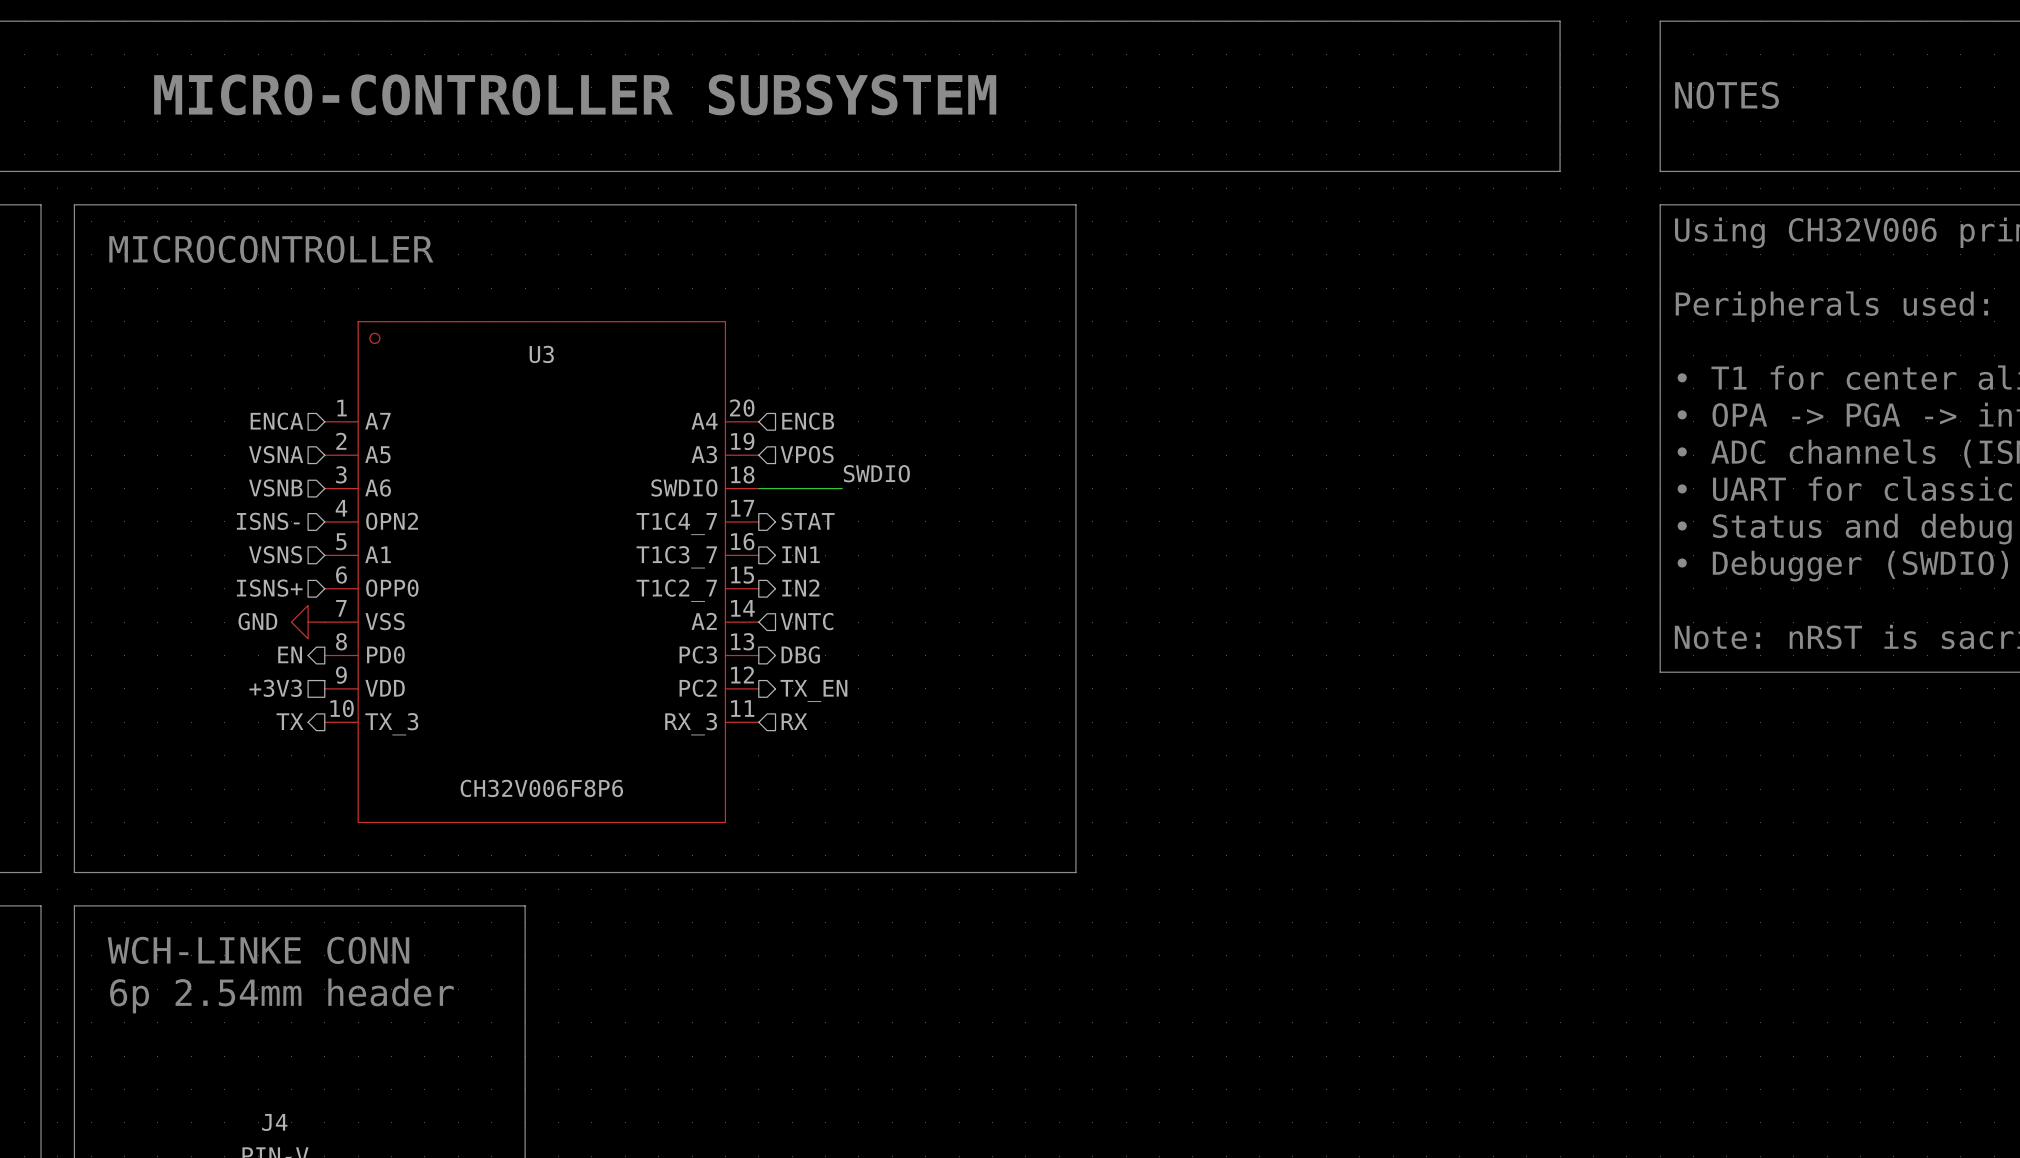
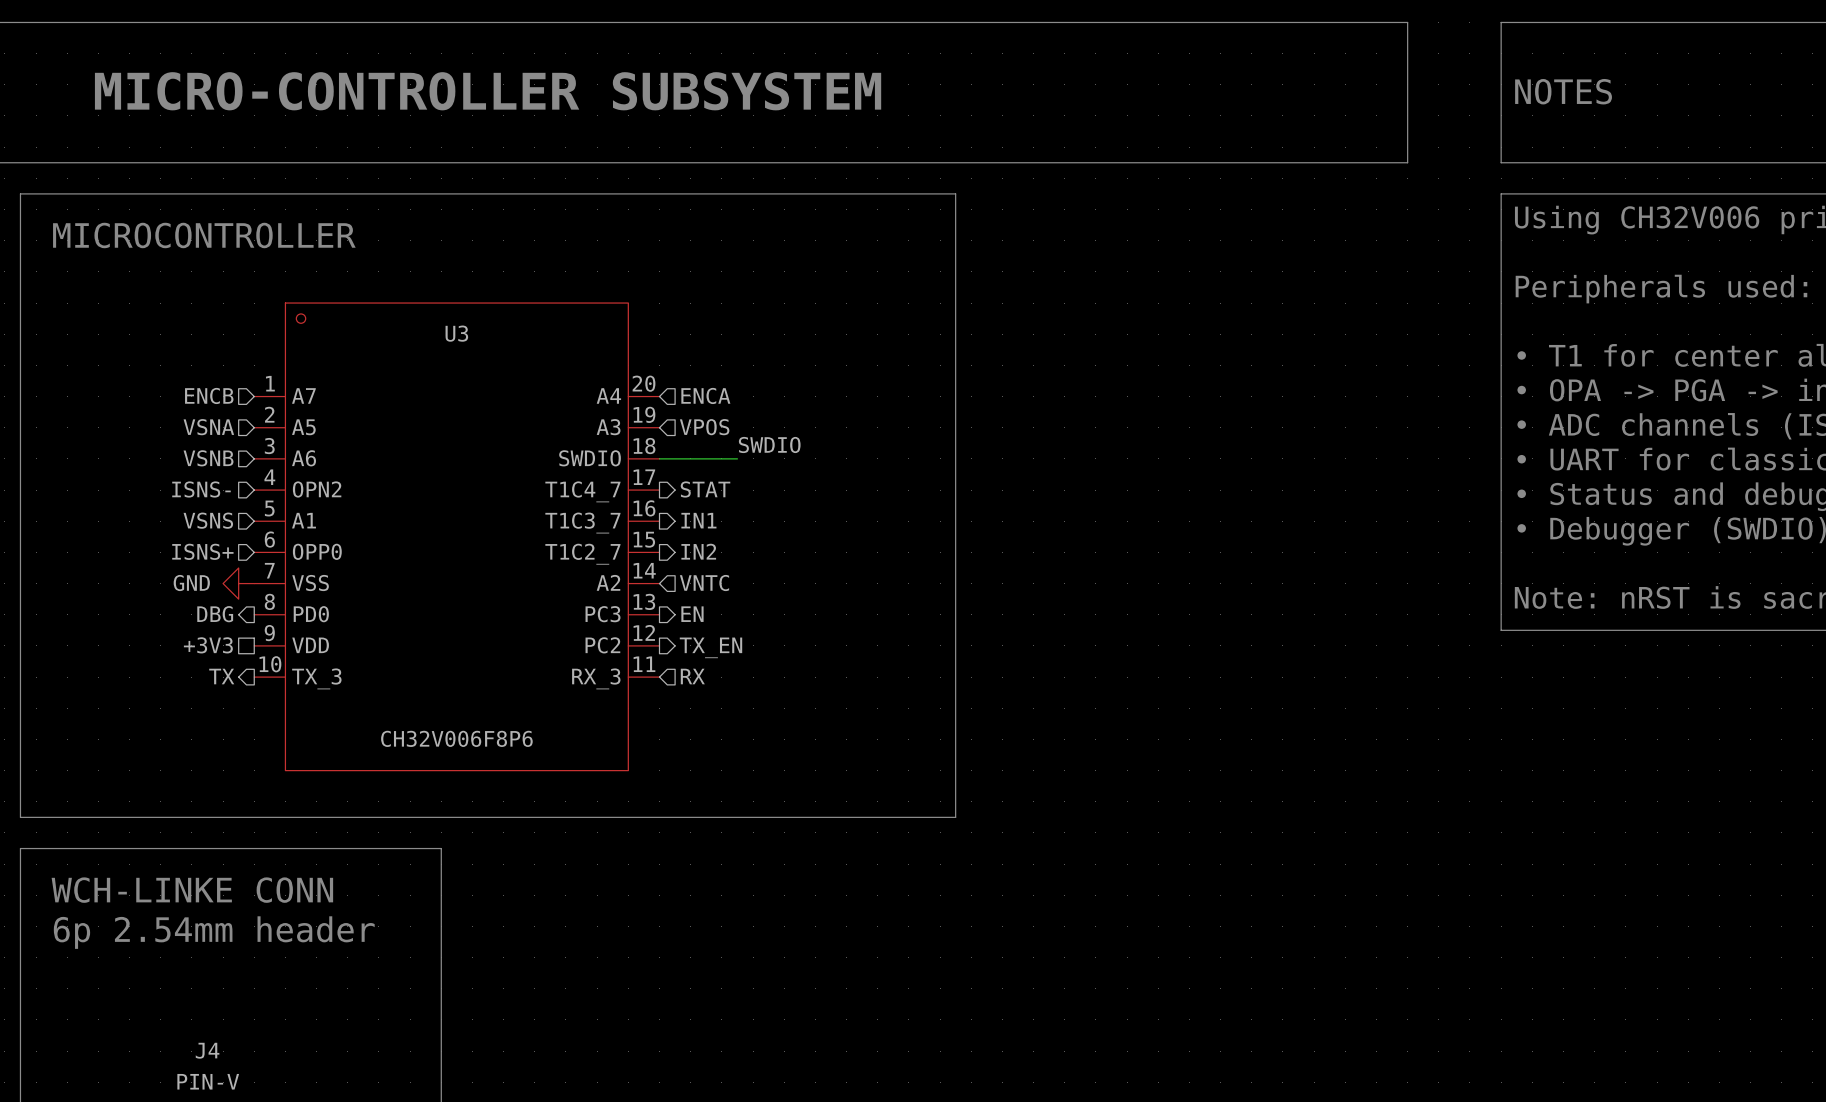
hierarchical label: ENCA (276, 421) -> ENCB (209, 395)
hierarchical label: ENCB (808, 421) -> ENCA (705, 395)
hierarchical label: EN (290, 654) -> DBG (215, 614)
hierarchical label: DBG (800, 654) -> EN (692, 614)

